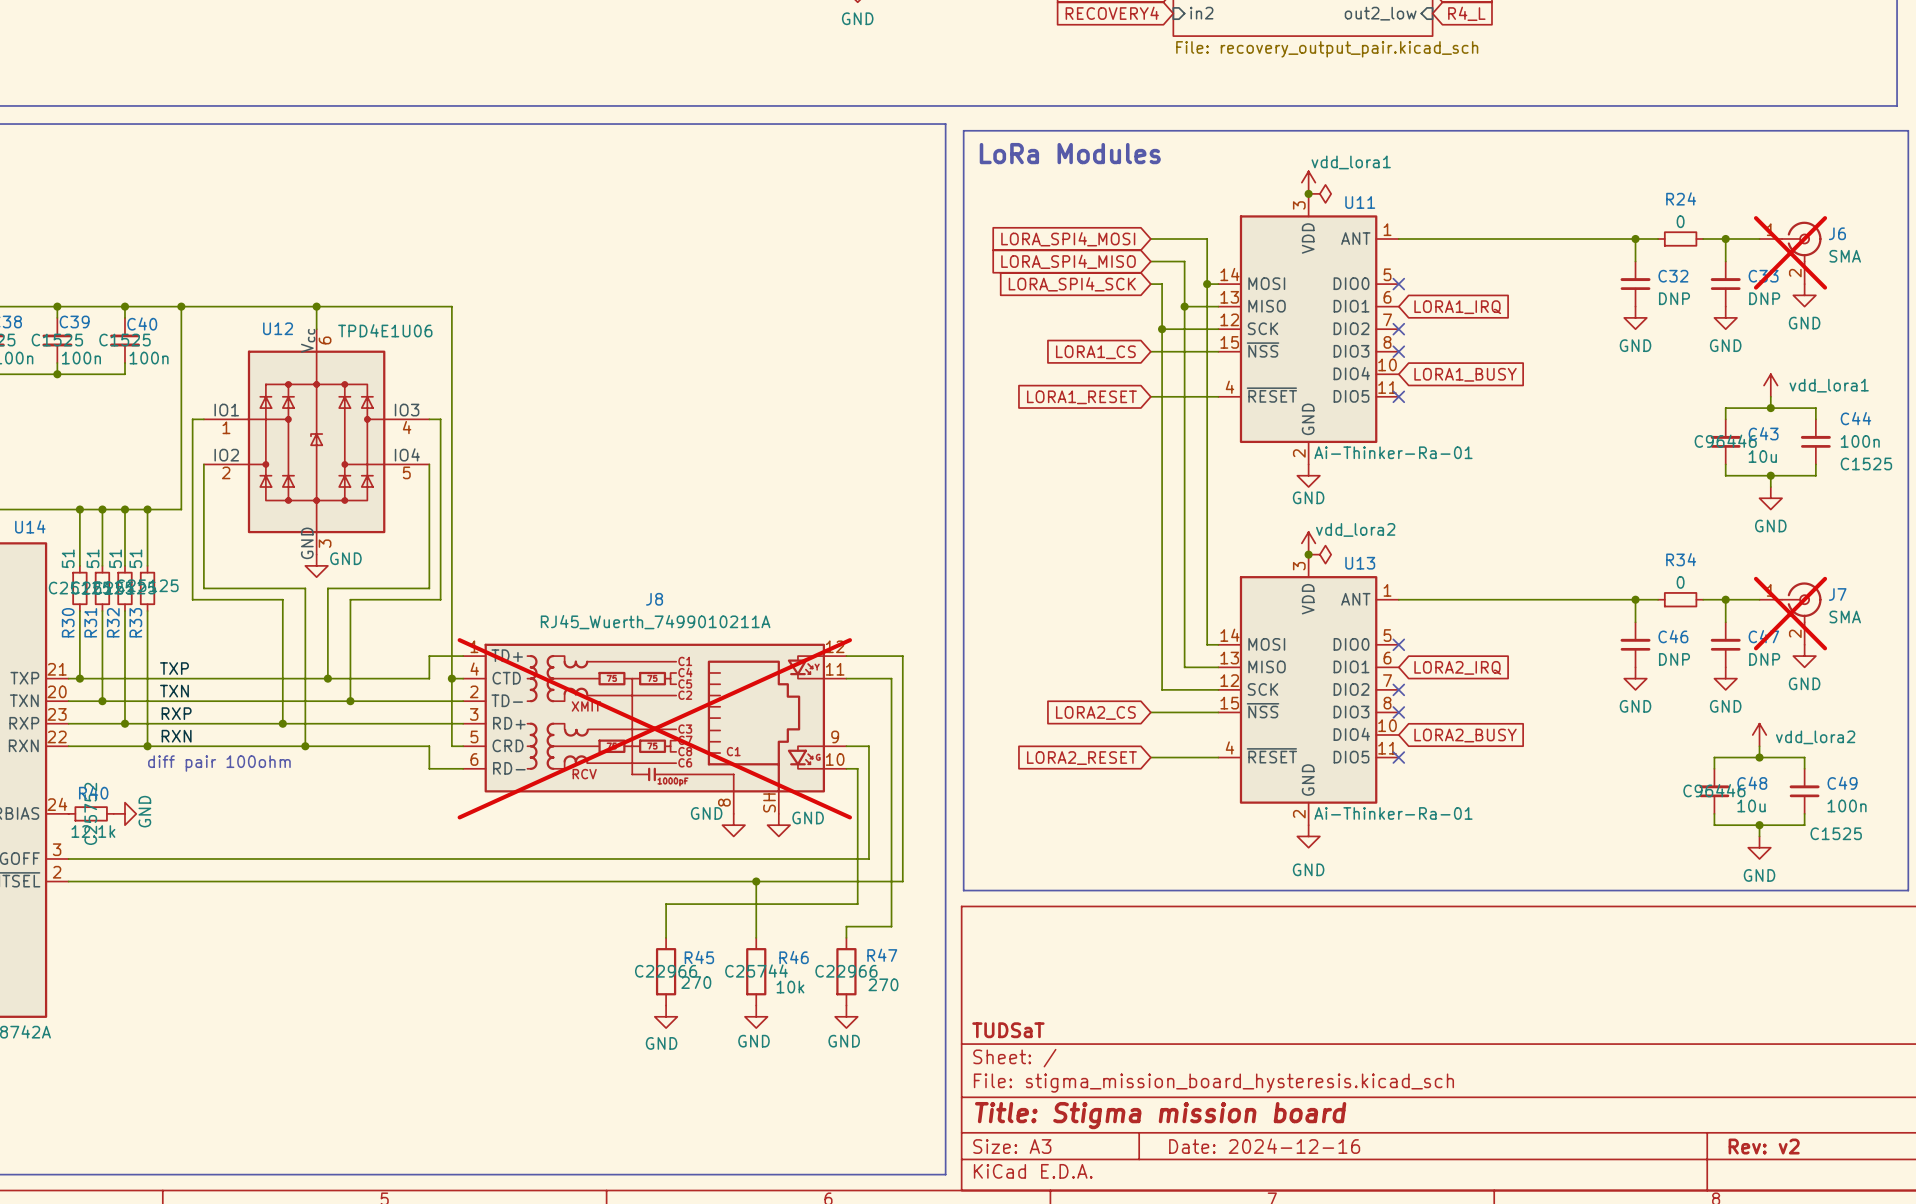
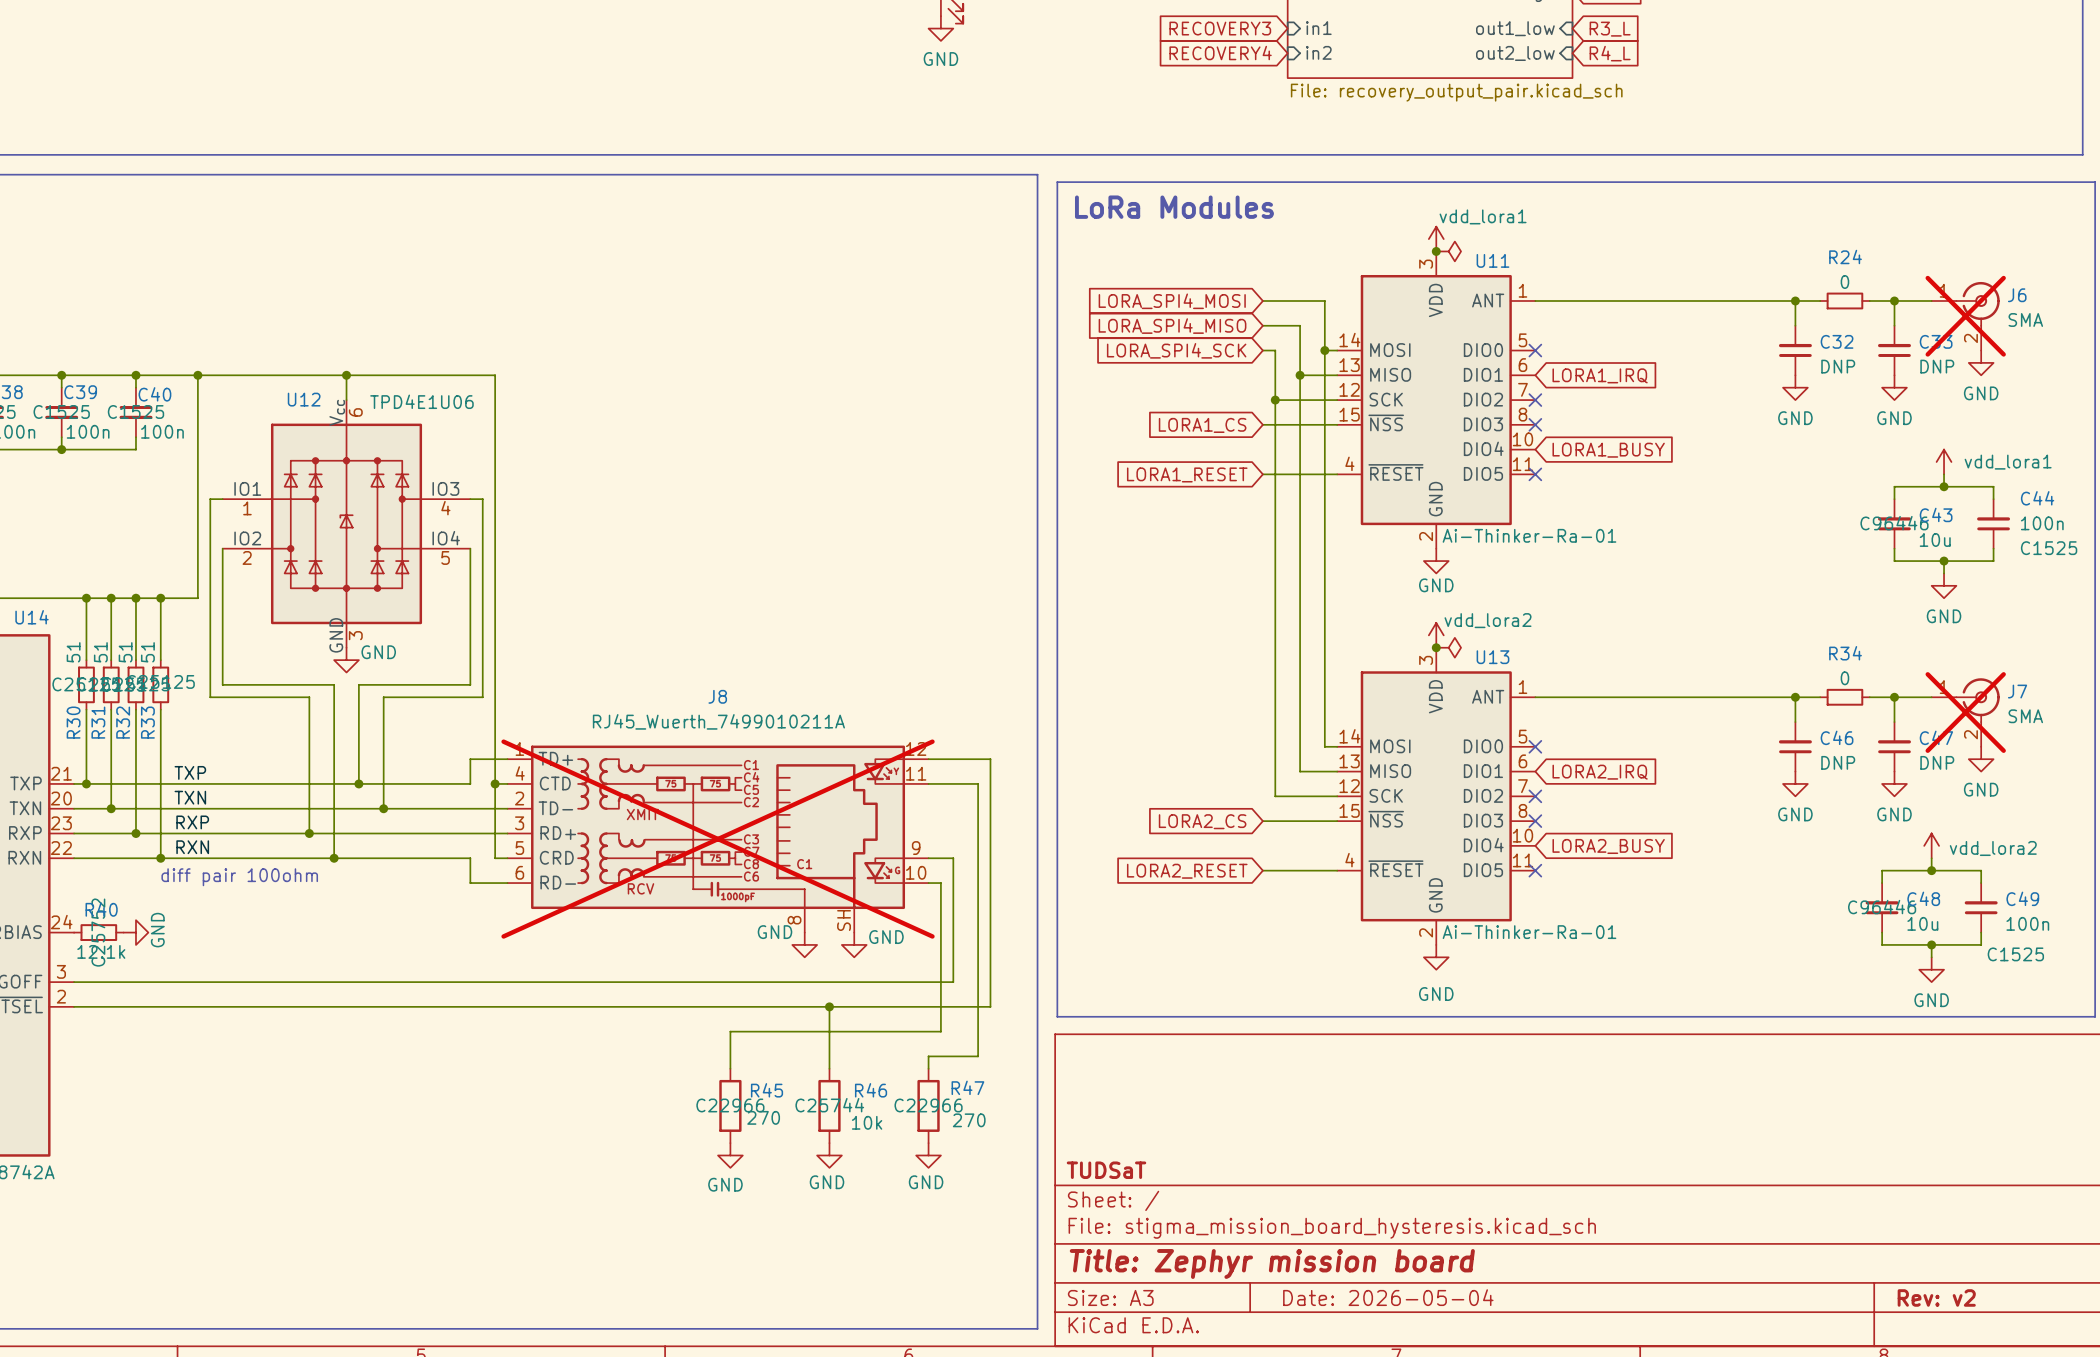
title block: Title: Stigma mission board (1160, 1115) -> Title: Zephyr mission board (1272, 1263)
title block: Date: 2024-12-16 (1264, 1146) -> Date: 2026-05-04 (1388, 1297)

